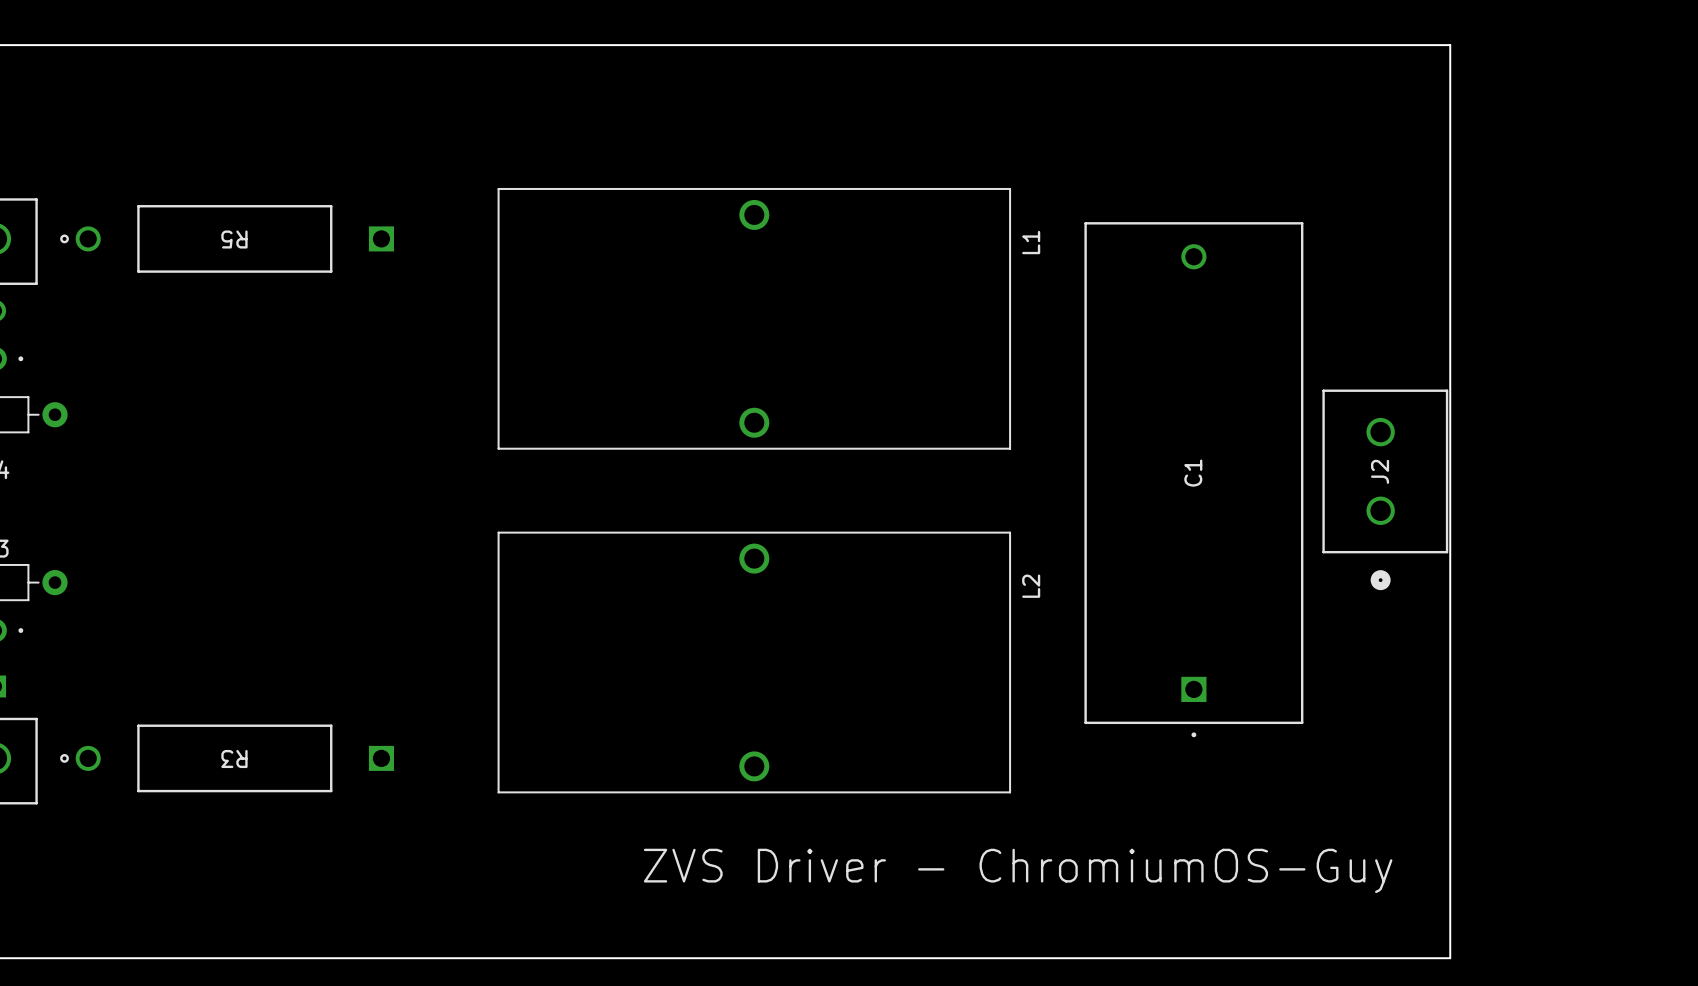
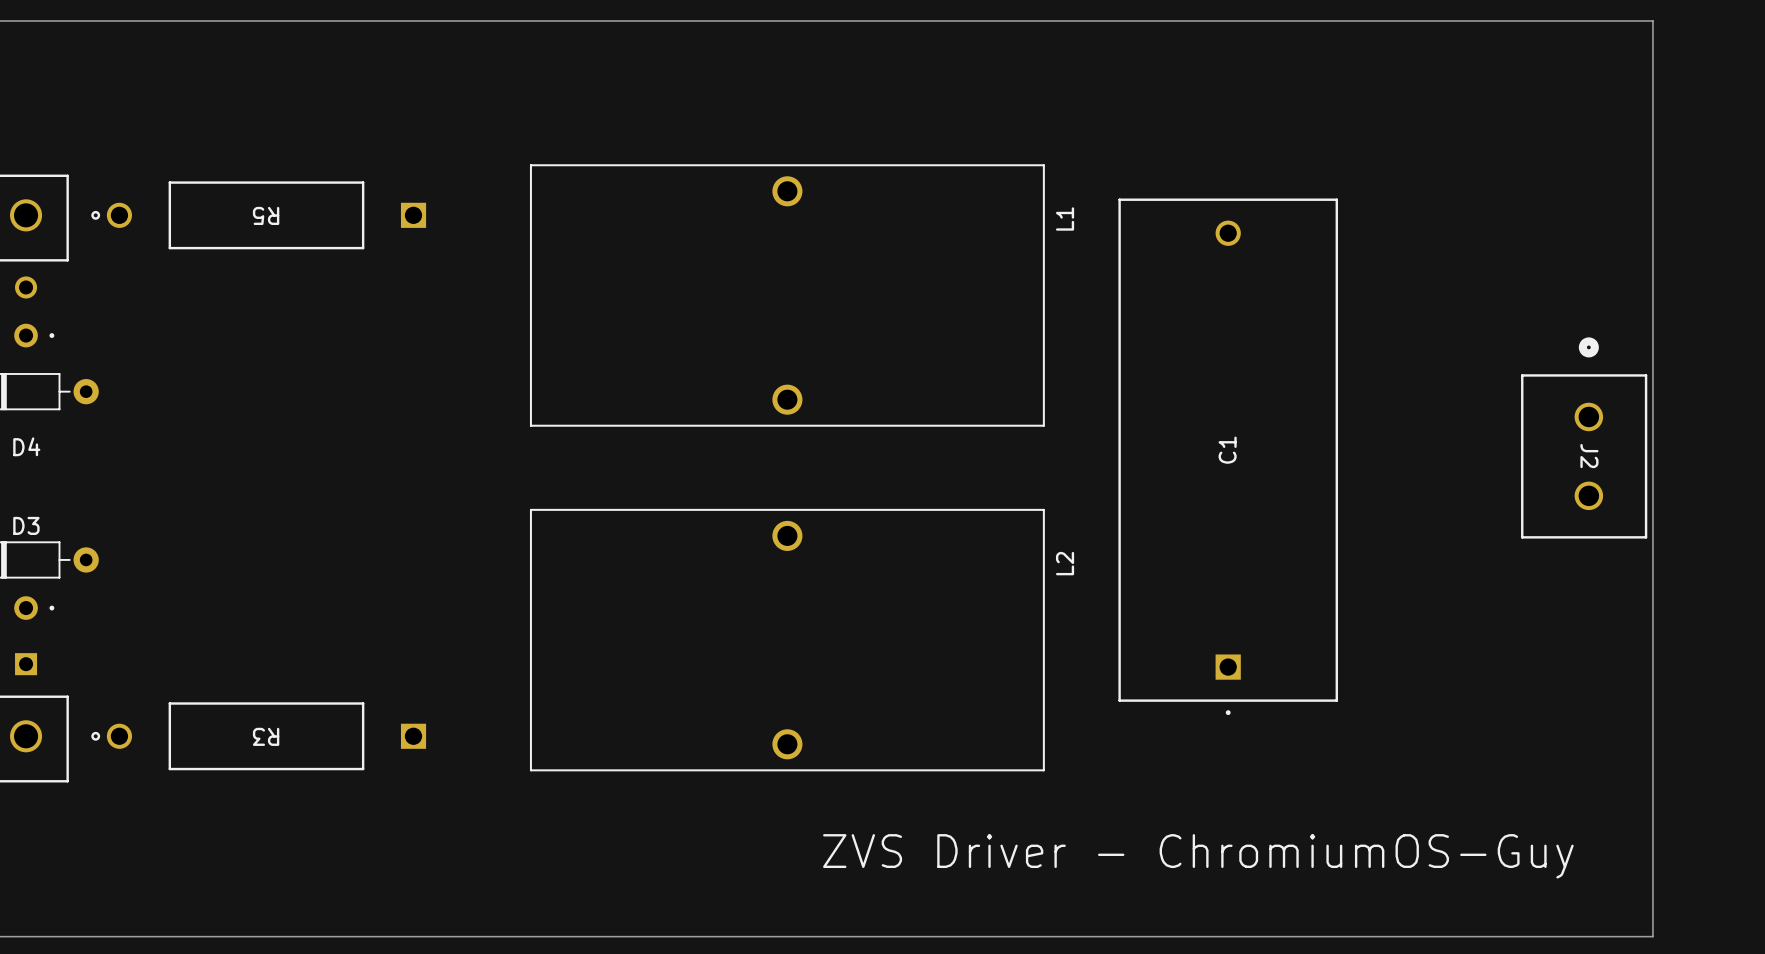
board edge: (1450, 45) (1450, 958) -> (1485, 20) (1652, 20) (1652, 936) (1485, 936)
J2 rotation: 0° (1385, 489) -> 180° (1584, 437)
J2 position: (1385, 489) -> (1584, 437)
text position: ZVS Driver - ChromiumOS-Guy (1018, 870) -> ZVS Driver - ChromiumOS-Guy (1198, 856)

